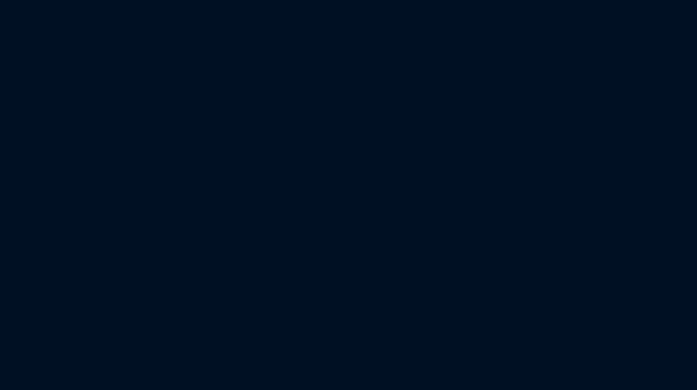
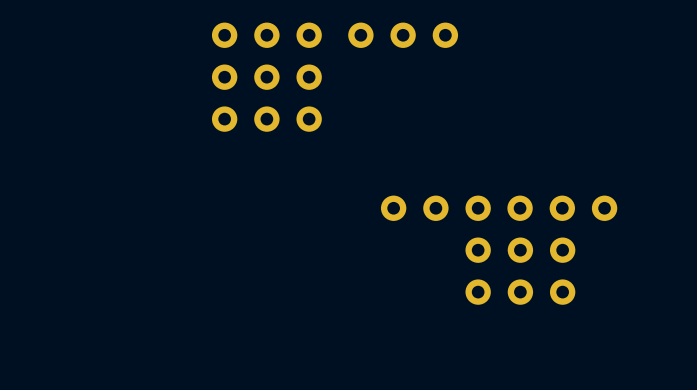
part: none -> (266, 35)
part: none -> (403, 35)
part: none -> (266, 77)
part: none -> (266, 119)
part: none -> (435, 208)
part: none -> (562, 208)
part: none -> (520, 250)
part: none -> (520, 292)

